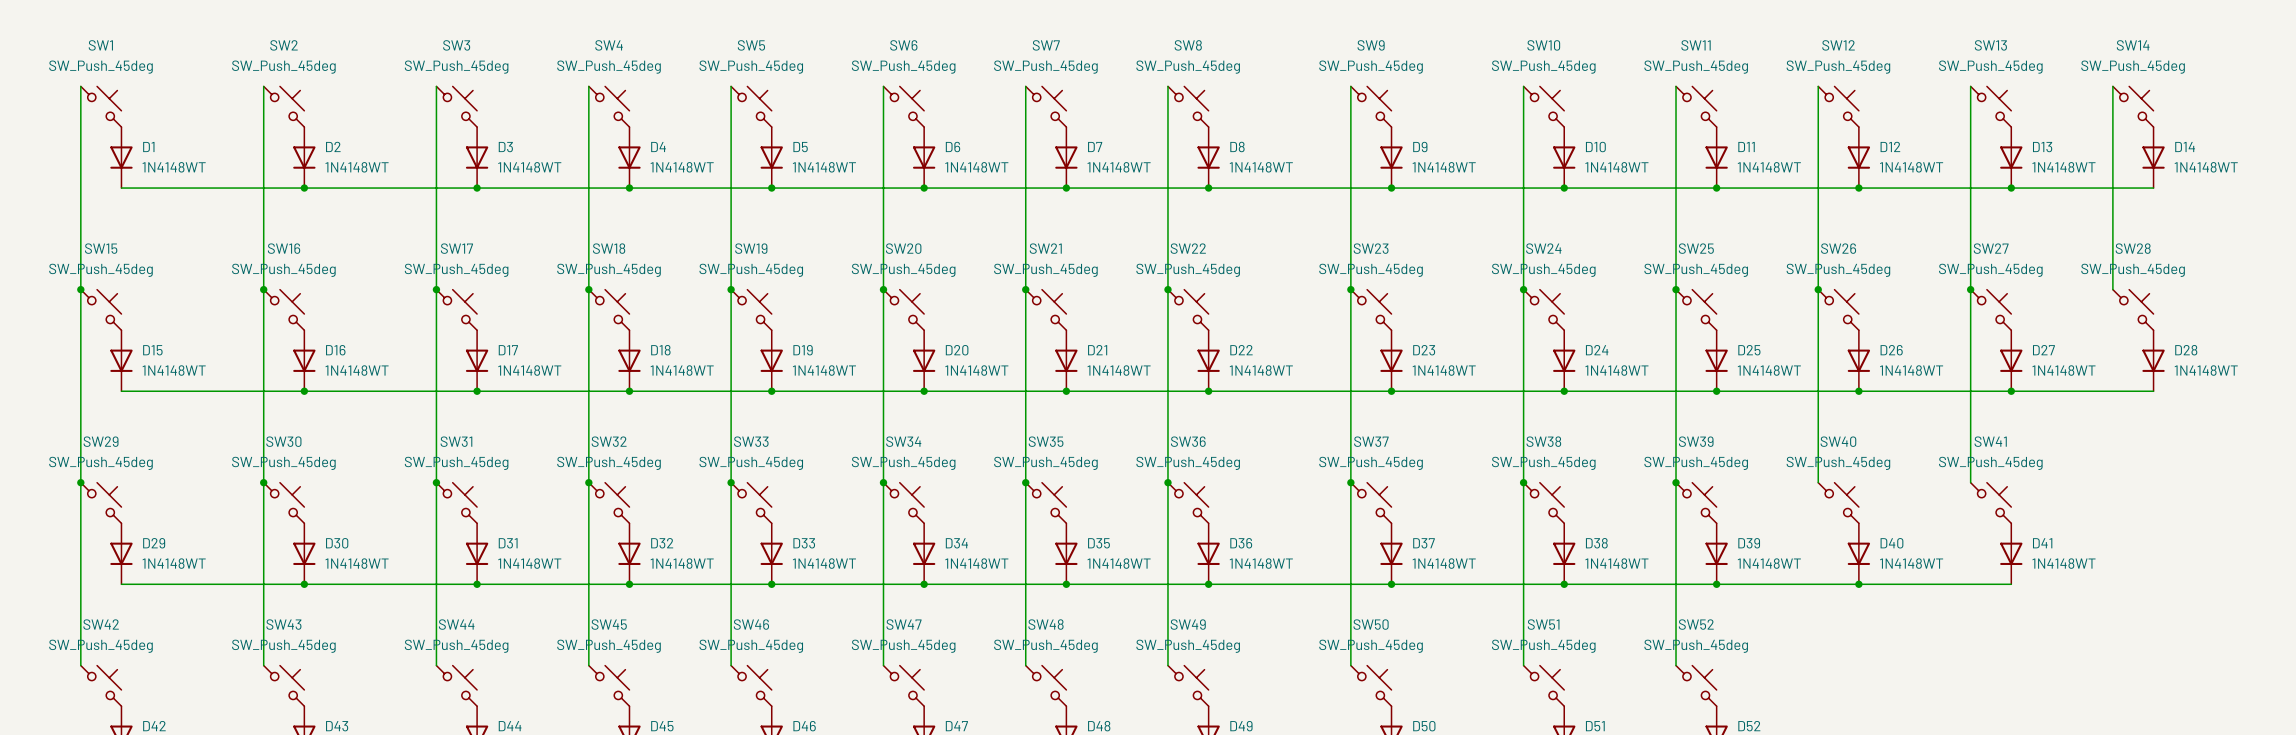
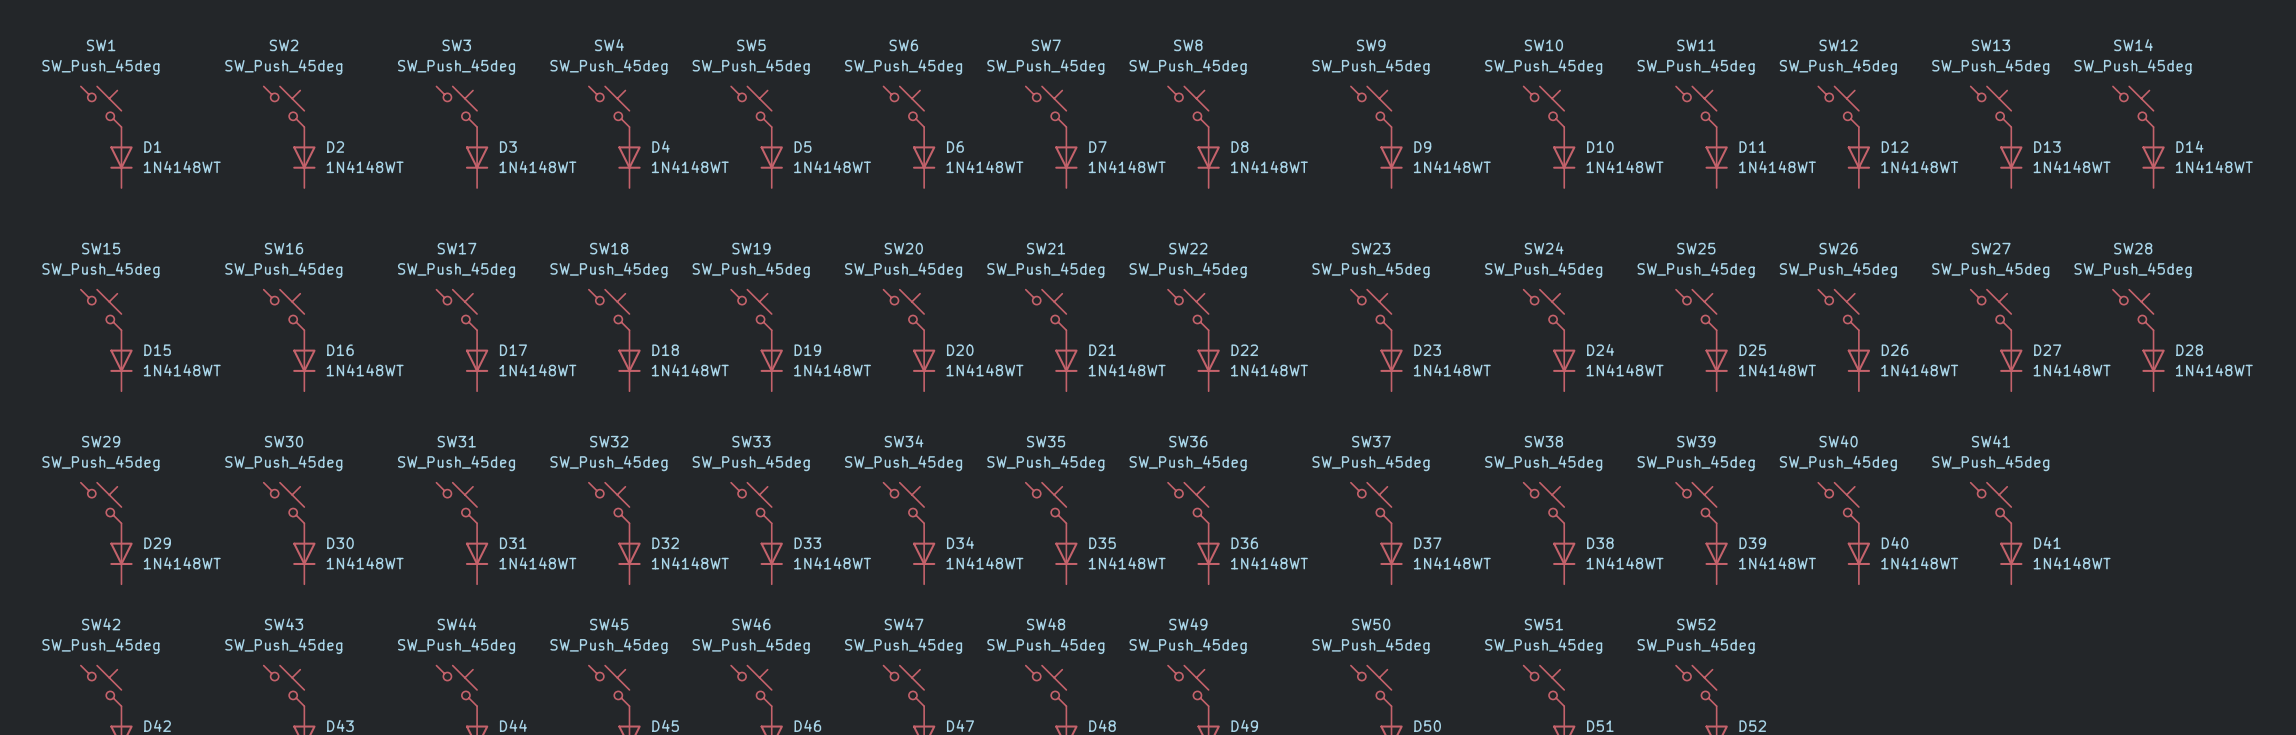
wire: (80, 86) (80, 665) -> none
wire: (263, 86) (263, 665) -> none
wire: (436, 86) (436, 665) -> none
wire: (588, 86) (588, 665) -> none
wire: (731, 86) (731, 665) -> none
wire: (883, 86) (883, 665) -> none
wire: (1025, 86) (1025, 665) -> none
wire: (1167, 86) (1167, 665) -> none
wire: (1350, 86) (1350, 665) -> none
wire: (1523, 86) (1523, 665) -> none
wire: (1676, 86) (1676, 665) -> none
wire: (1818, 86) (1818, 482) -> none
wire: (1970, 86) (1970, 482) -> none
wire: (2112, 86) (2112, 289) -> none
wire: (121, 188) (2153, 188) -> none
junction: (304, 188) -> none
junction: (477, 188) -> none
junction: (629, 188) -> none
junction: (771, 188) -> none
junction: (924, 188) -> none
junction: (1066, 188) -> none
junction: (1208, 188) -> none
junction: (1391, 188) -> none
junction: (1564, 188) -> none
junction: (1716, 188) -> none
junction: (1858, 188) -> none
junction: (2011, 188) -> none
junction: (80, 289) -> none
junction: (263, 289) -> none
junction: (436, 289) -> none
junction: (588, 289) -> none
junction: (731, 289) -> none
junction: (883, 289) -> none
junction: (1025, 289) -> none
junction: (1167, 289) -> none
junction: (1350, 289) -> none
junction: (1523, 289) -> none
junction: (1676, 289) -> none
junction: (1818, 289) -> none
junction: (1970, 289) -> none
wire: (121, 391) (2153, 391) -> none
junction: (304, 391) -> none
junction: (477, 391) -> none
junction: (629, 391) -> none
junction: (771, 391) -> none
junction: (924, 391) -> none
junction: (1066, 391) -> none
junction: (1208, 391) -> none
junction: (1391, 391) -> none
junction: (1564, 391) -> none
junction: (1716, 391) -> none
junction: (1858, 391) -> none
junction: (2011, 391) -> none
junction: (80, 482) -> none
junction: (263, 482) -> none
junction: (436, 482) -> none
junction: (588, 482) -> none
junction: (731, 482) -> none
junction: (883, 482) -> none
junction: (1025, 482) -> none
junction: (1167, 482) -> none
junction: (1350, 482) -> none
junction: (1523, 482) -> none
junction: (1676, 482) -> none
wire: (121, 584) (2011, 584) -> none
junction: (304, 584) -> none
junction: (477, 584) -> none
junction: (629, 584) -> none
junction: (771, 584) -> none
junction: (924, 584) -> none
junction: (1066, 584) -> none
junction: (1208, 584) -> none
junction: (1391, 584) -> none
junction: (1564, 584) -> none
junction: (1716, 584) -> none
junction: (1858, 584) -> none

